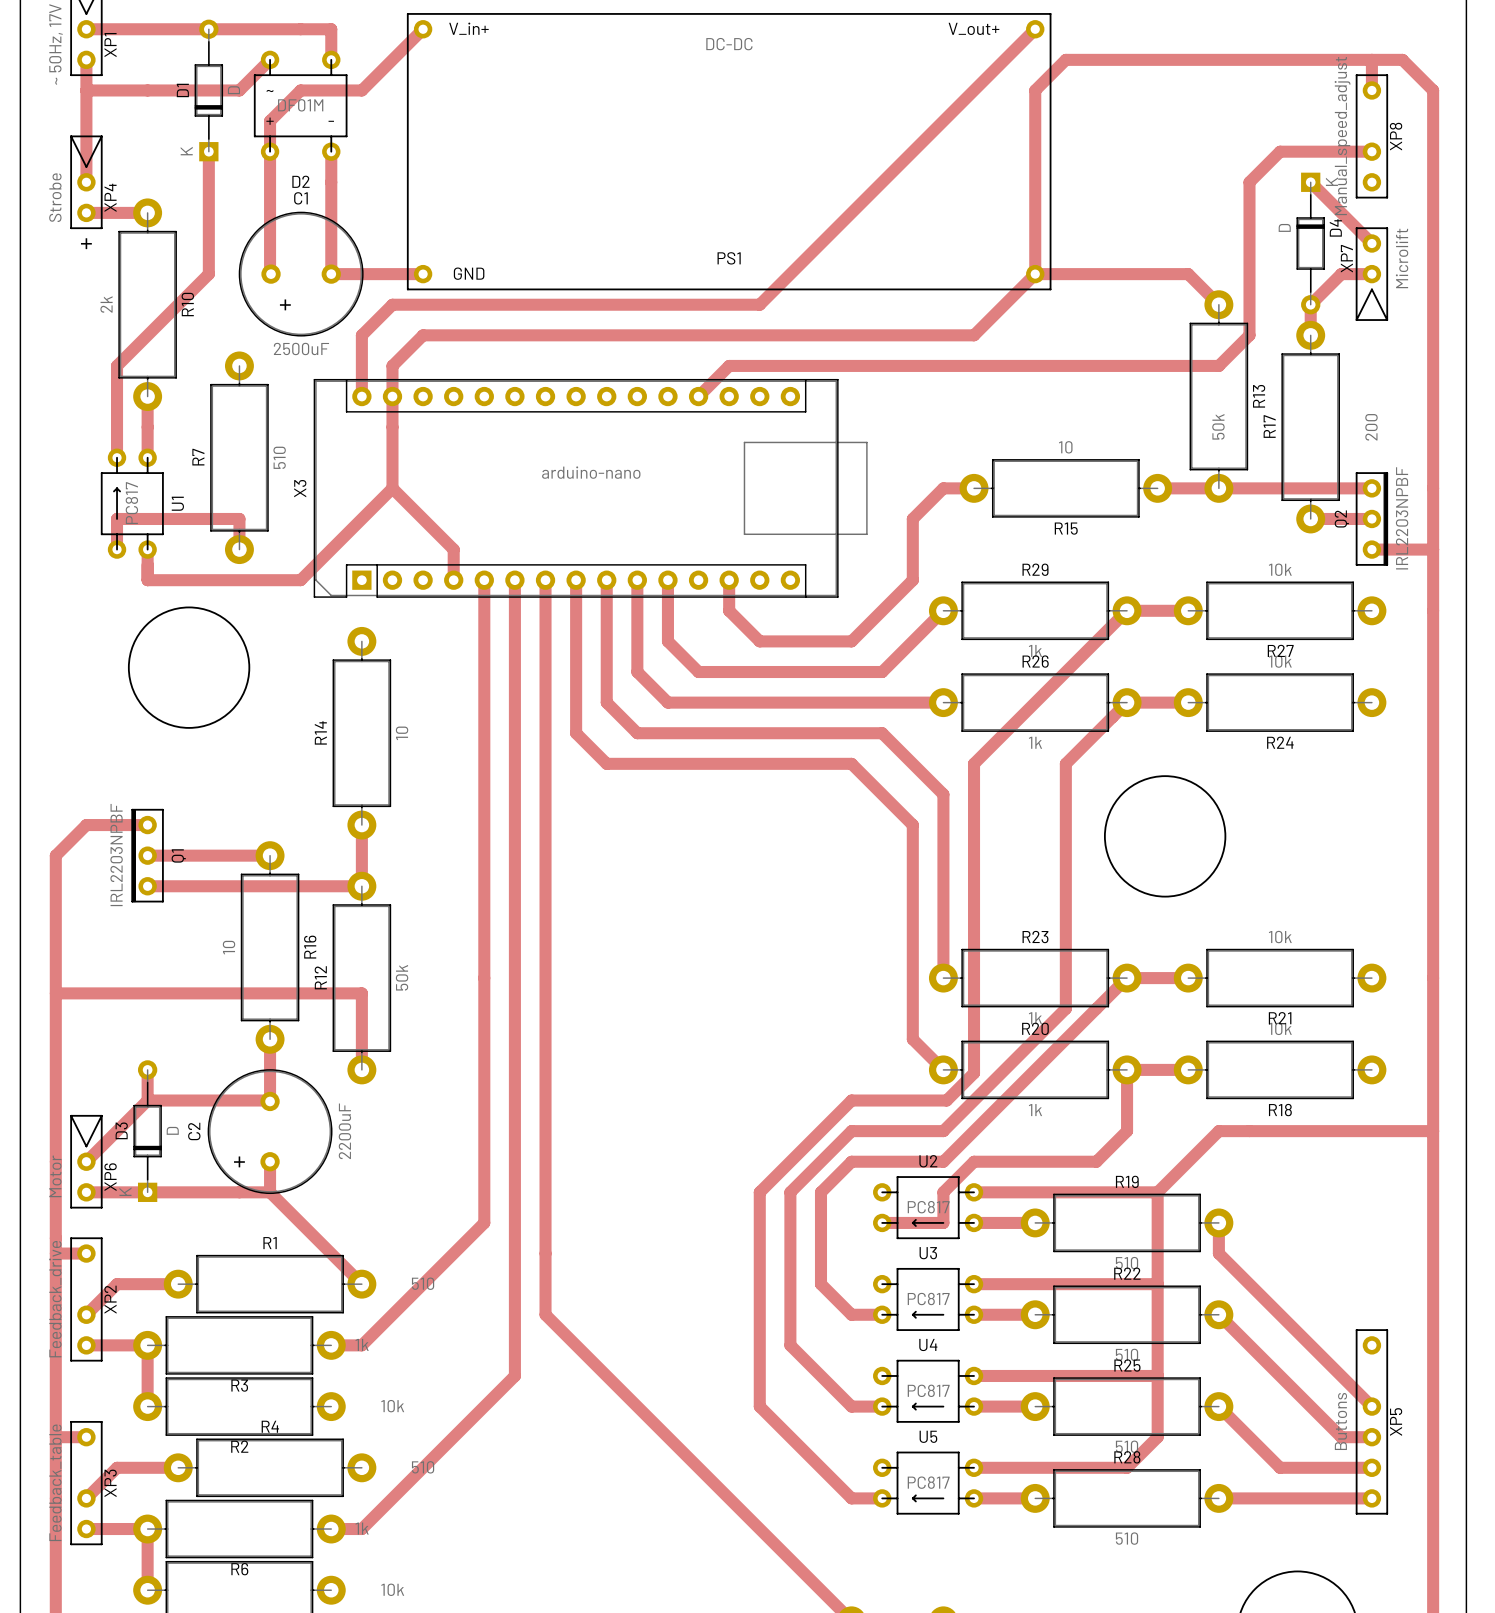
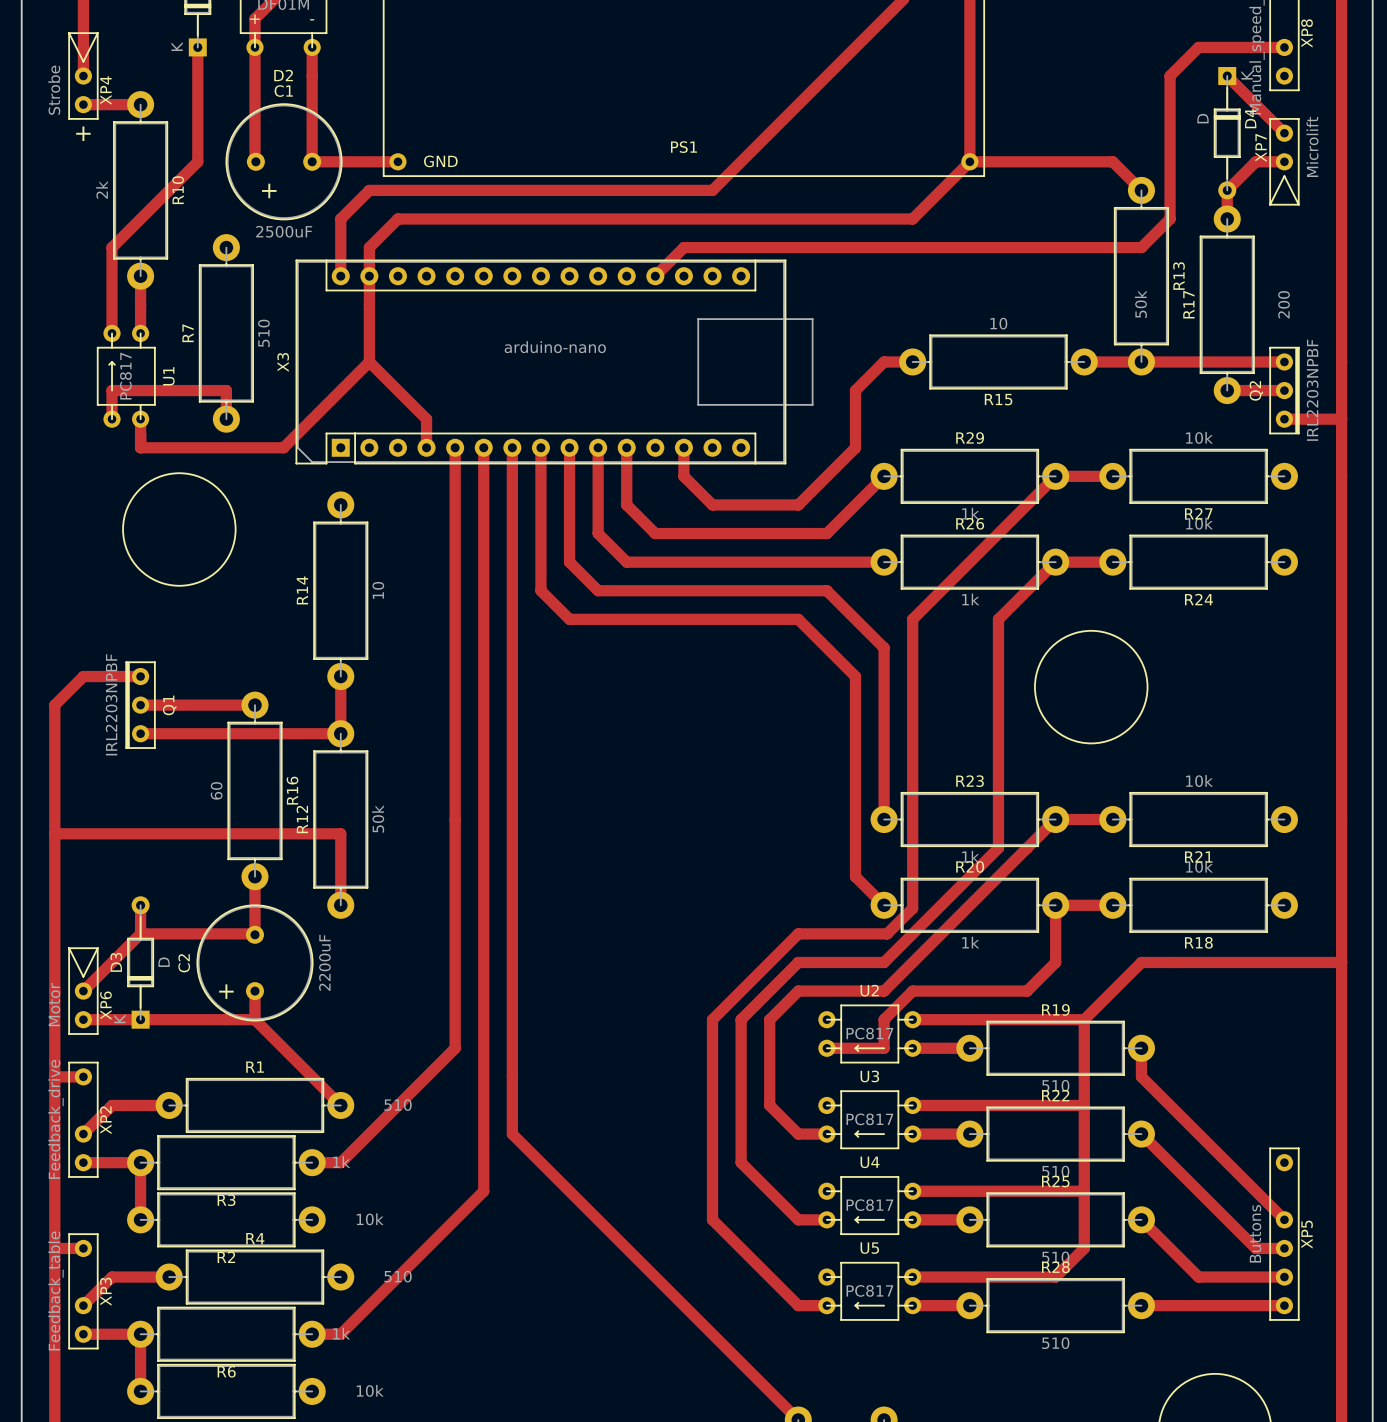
R16 value: 10 (229, 947) -> 60 (216, 790)

